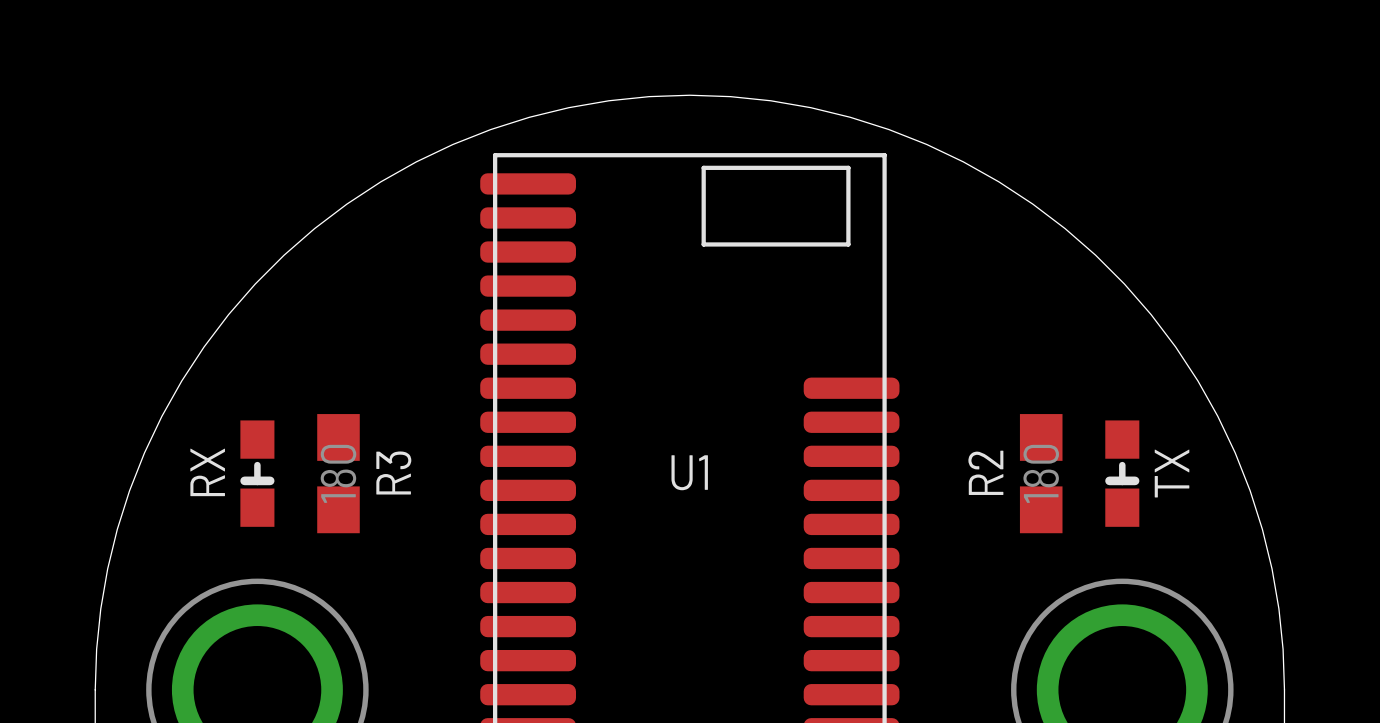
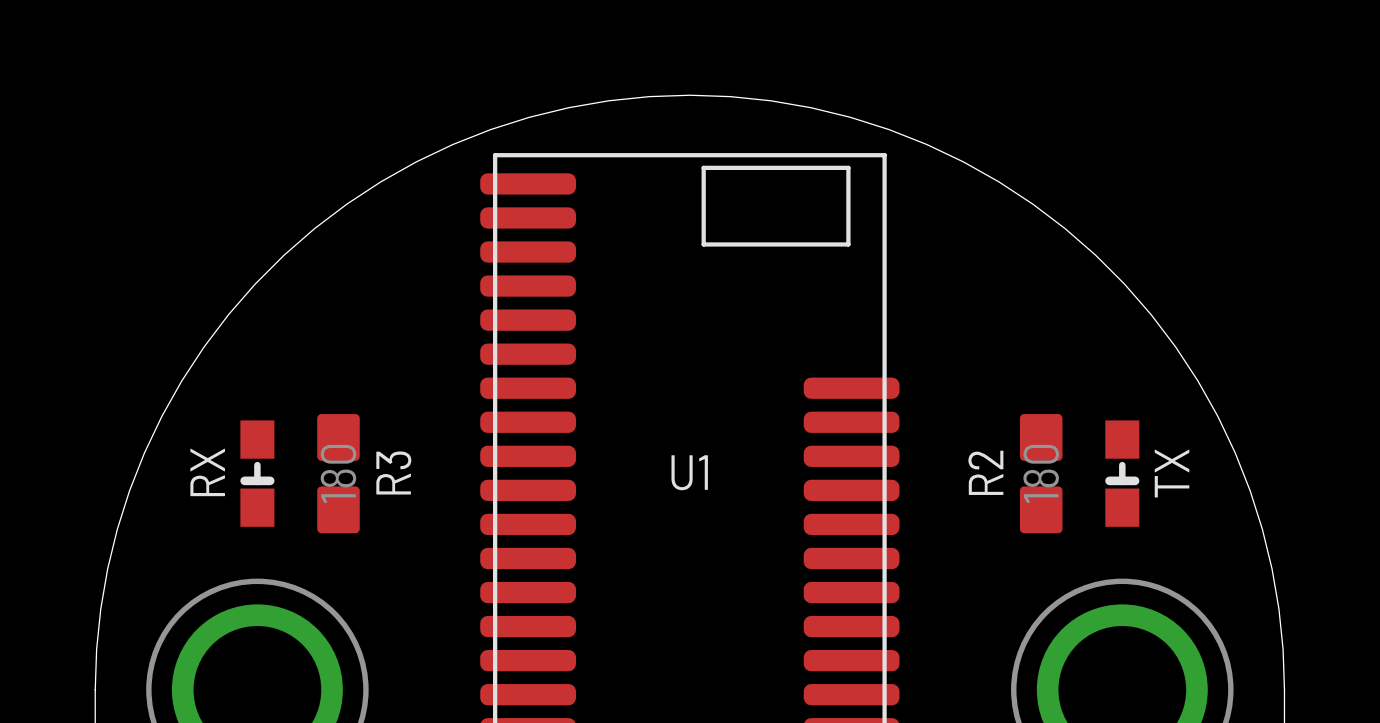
R3 footprint: [317, 414, 360, 534] -> [317, 414, 360, 534]
R2 footprint: [1019, 414, 1063, 534] -> [1019, 414, 1063, 534]

